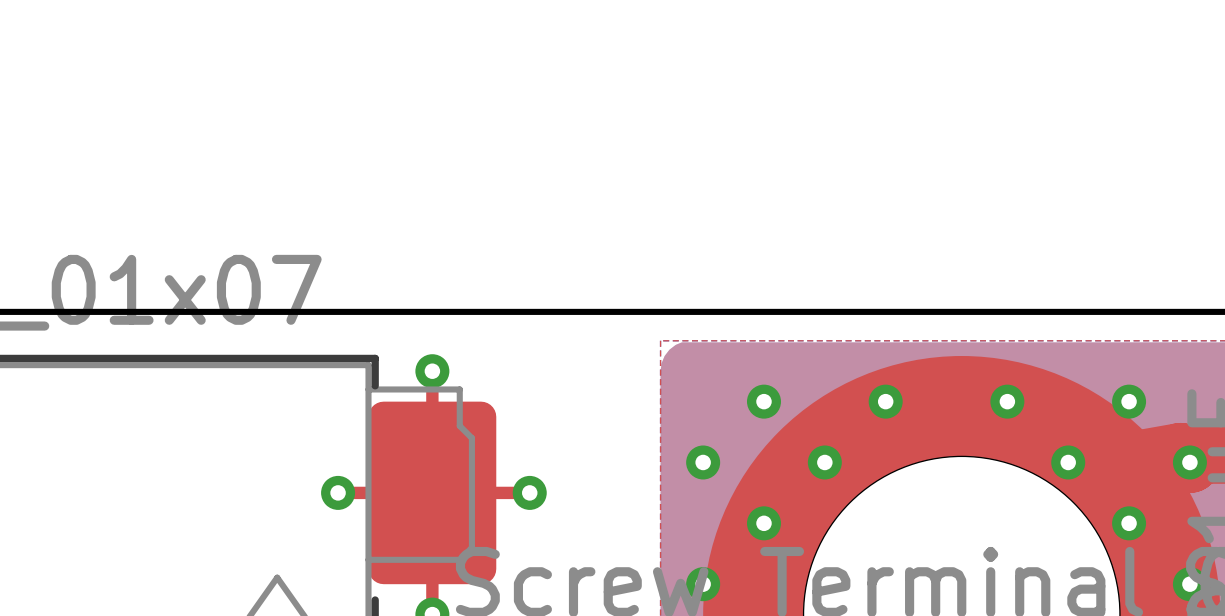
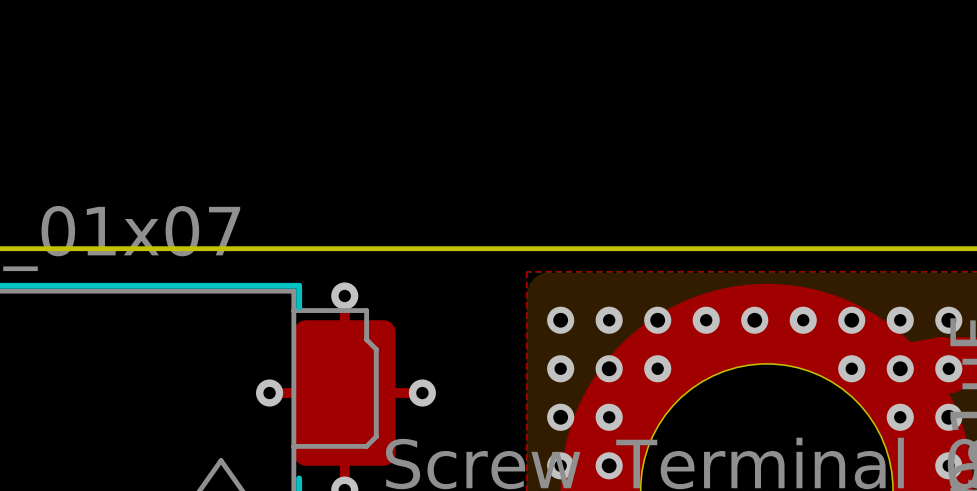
via: none -> (560, 320)
via: none -> (657, 320)
via: none -> (754, 320)
via: none -> (851, 320)
via: none -> (948, 320)
via: none -> (609, 368)
via: none -> (900, 368)
via: none -> (560, 417)
via: none -> (948, 417)
via: none -> (609, 465)

